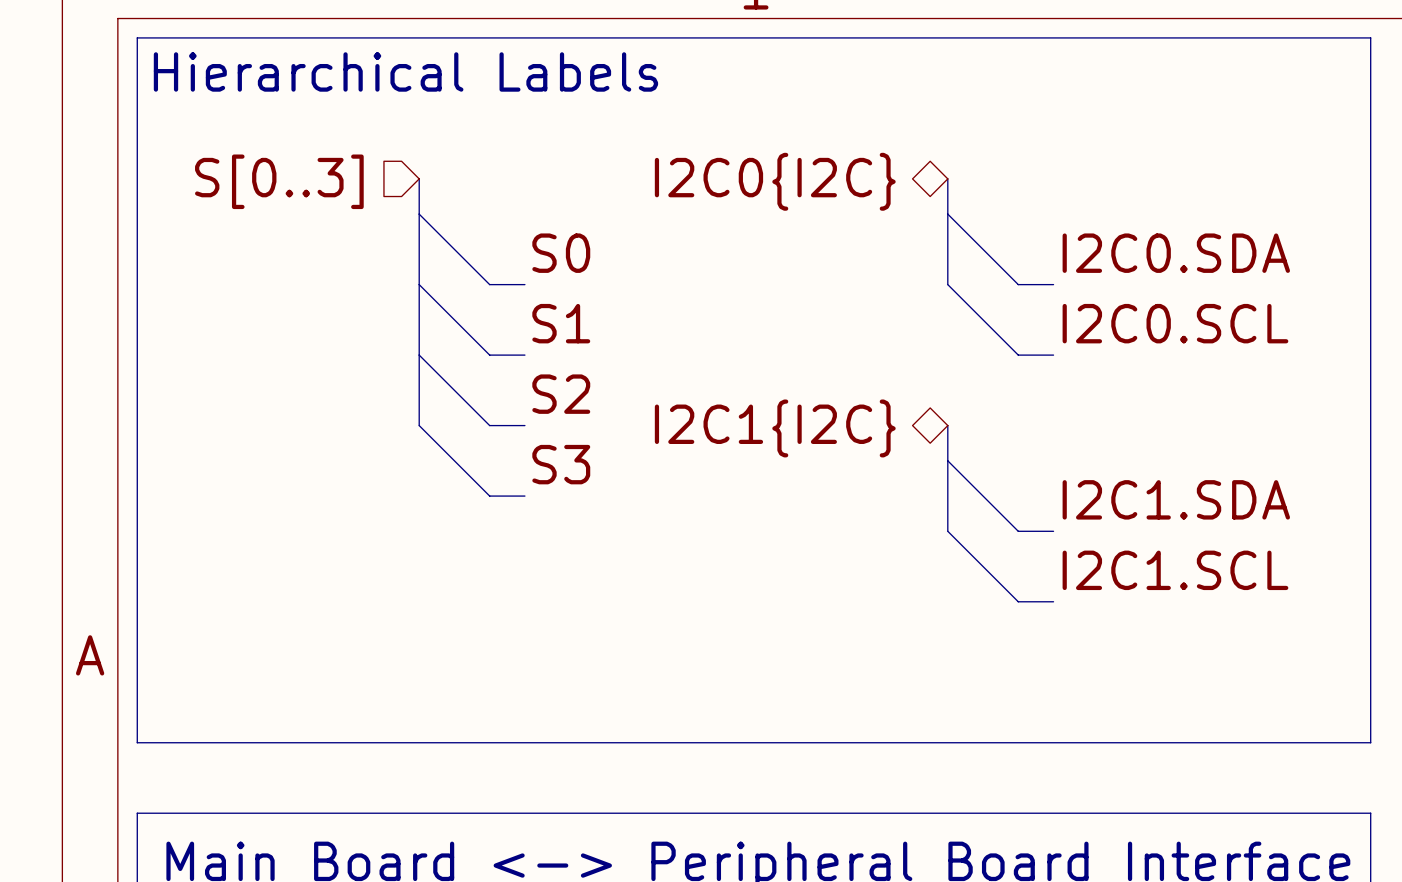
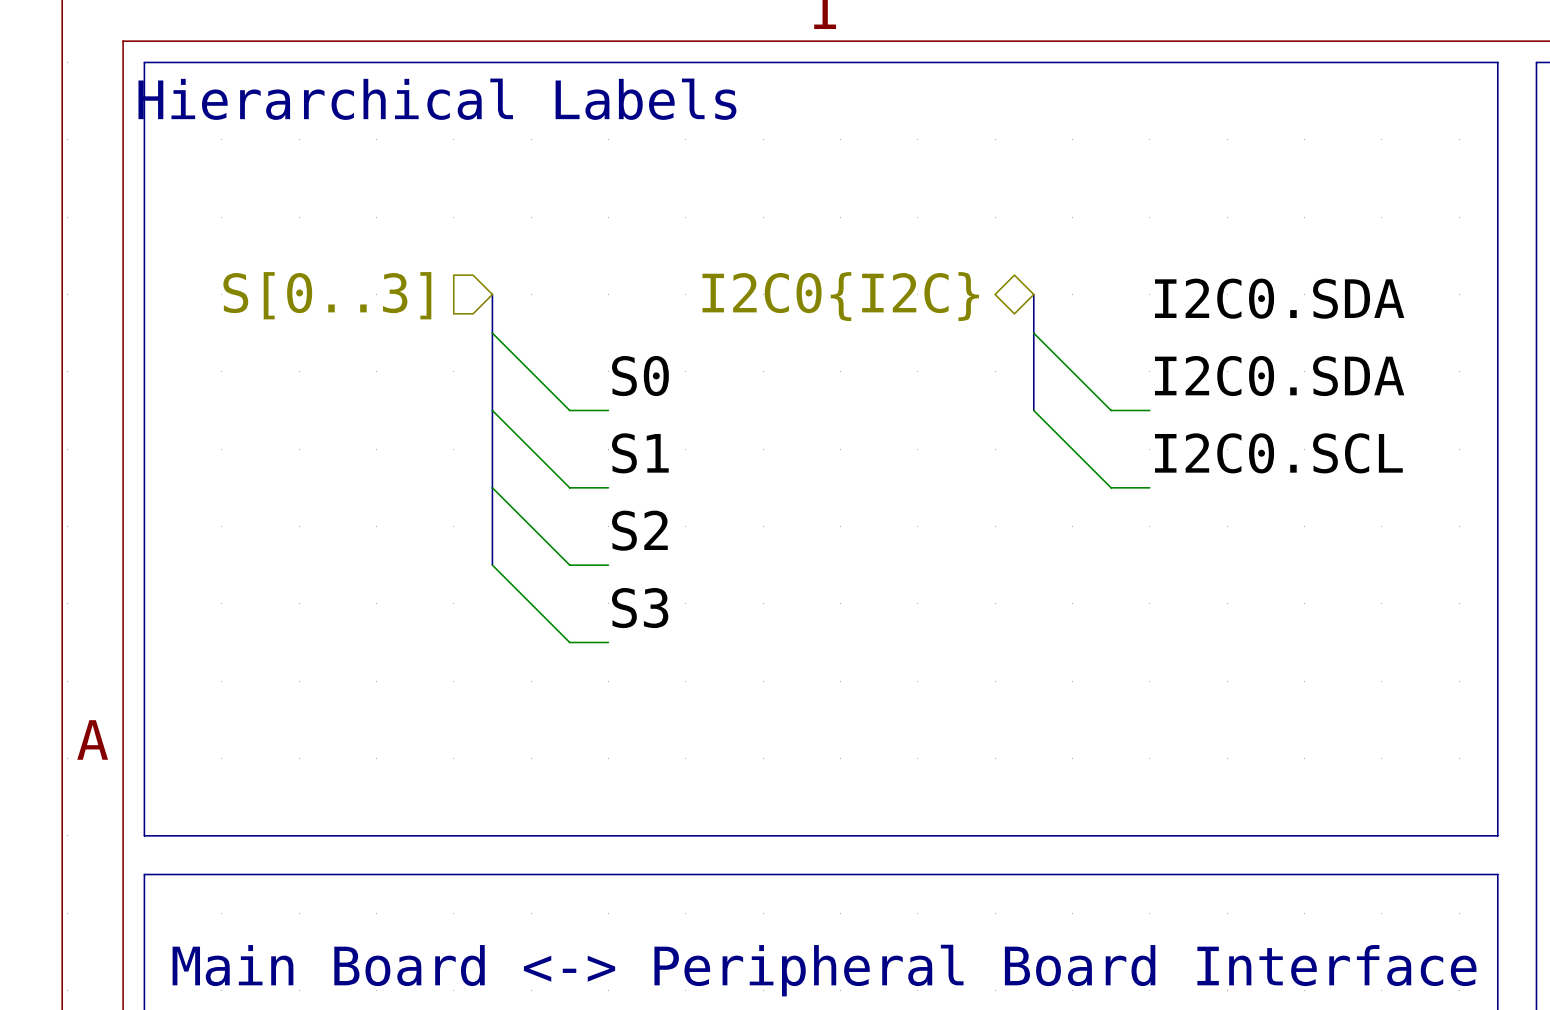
bus: (419, 178) (419, 425) -> (492, 294) (492, 565)
bus: (947, 178) (947, 249) -> (1033, 333) (1033, 410)
hierarchical label position: S[0..3] (279, 181) -> S[0..3] (327, 295)
hierarchical label position: I2C0{I2C} (775, 181) -> I2C0{I2C} (840, 296)
wire: (419, 214) (489, 284) (524, 284) -> (492, 333) (569, 410) (608, 410)
wire: (947, 214) (1018, 284) (1053, 284) -> none
label position: S0 (561, 253) -> S0 (640, 376)
wire: (419, 284) (489, 355) (524, 355) -> (492, 410) (569, 487) (608, 487)
label position: S1 (561, 323) -> S1 (640, 453)
label: I2C0.SCL (1175, 323) -> I2C0.SDA (1279, 376)
wire: (419, 355) (489, 425) (524, 425) -> (492, 487) (569, 565) (608, 565)
label position: S2 (561, 394) -> S2 (639, 530)
label: none -> I2C0.SCL (1278, 453)
wire: (419, 425) (489, 496) (524, 496) -> (492, 565) (569, 642) (608, 642)
bus: (947, 425) (947, 531) -> none
hierarchical label: I2C1{I2C} (775, 428) -> none
wire: (947, 460) (1018, 531) (1053, 531) -> (1033, 410) (1111, 487) (1149, 487)
label position: S3 (561, 464) -> S3 (640, 608)
label: I2C1.SDA (1176, 499) -> none
wire: (947, 531) (1018, 601) (1053, 601) -> none
label: I2C1.SCL (1175, 570) -> none
line: (137, 813) (1370, 813) -> (144, 913) (144, 874) (1497, 874) (1497, 913)

